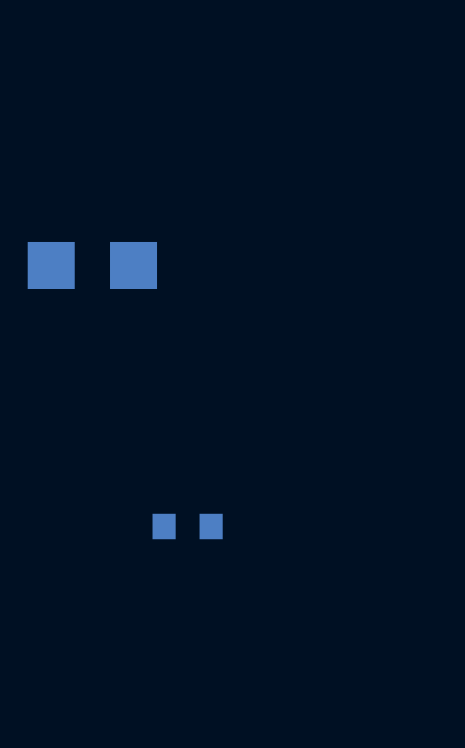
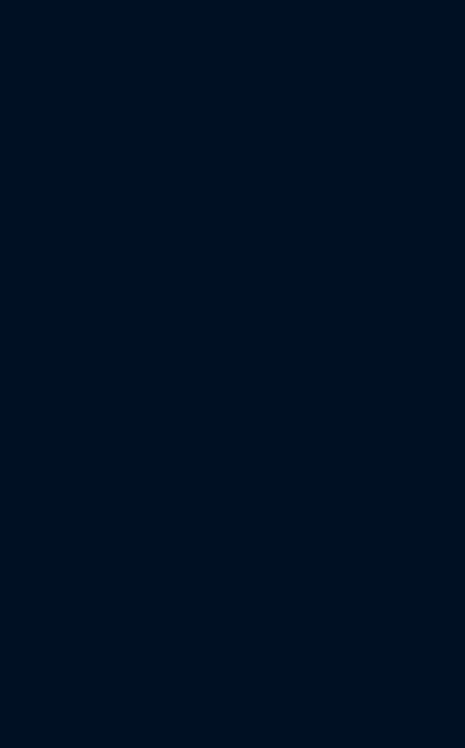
part: (92, 265) -> none
part: (187, 526) -> none

